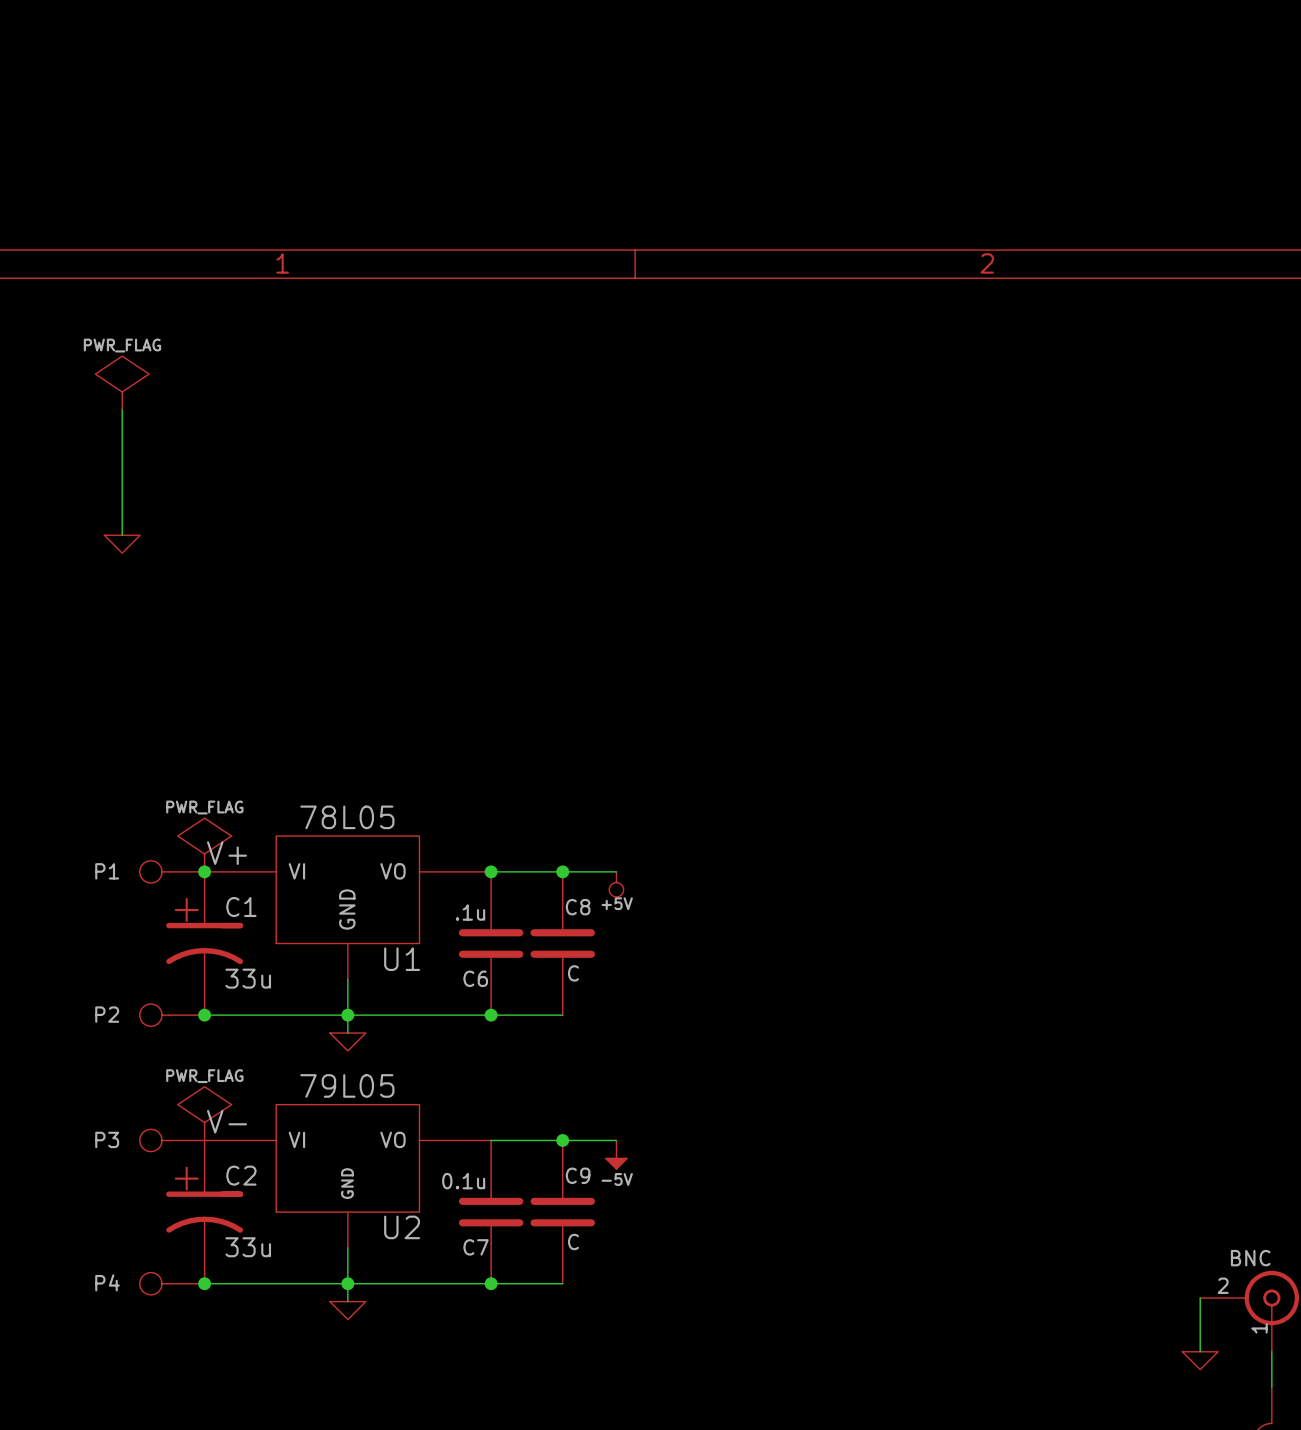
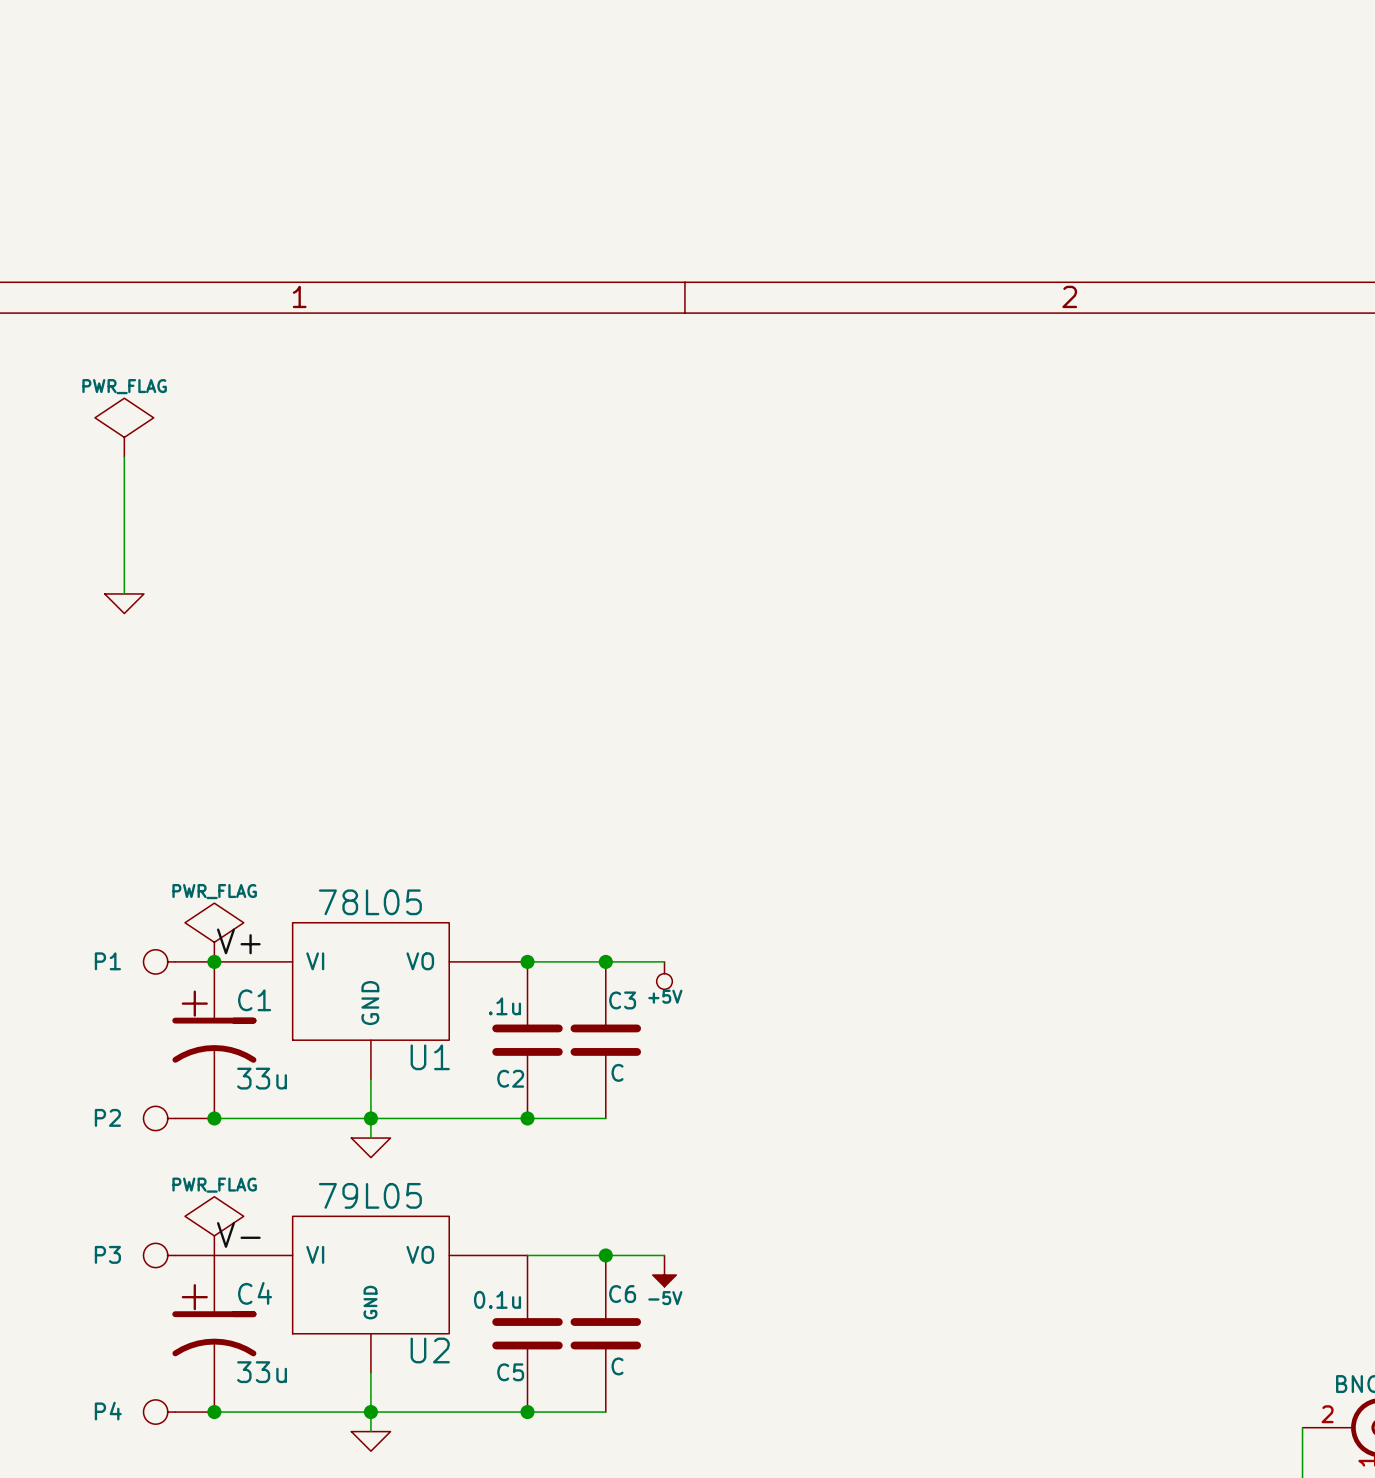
C8 name: C8 (578, 907) -> C3 (622, 1000)
C6 name: C6 (475, 978) -> C2 (510, 1078)
C2 name: C2 (241, 1175) -> C4 (255, 1293)
C9 name: C9 (578, 1175) -> C6 (622, 1294)
C7 name: C7 (476, 1247) -> C5 (510, 1372)

